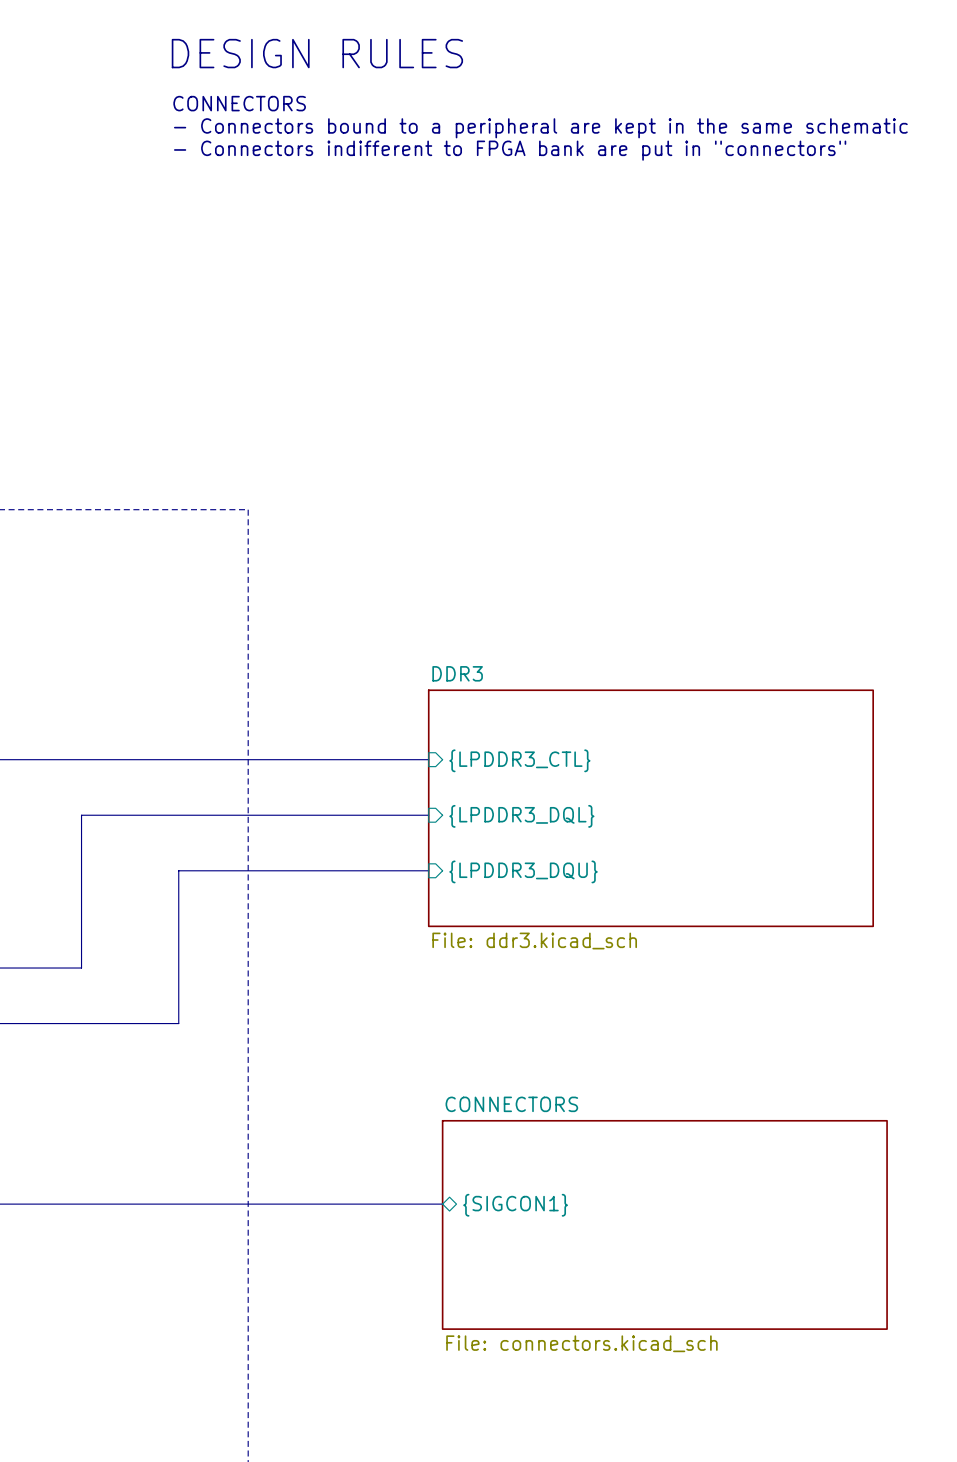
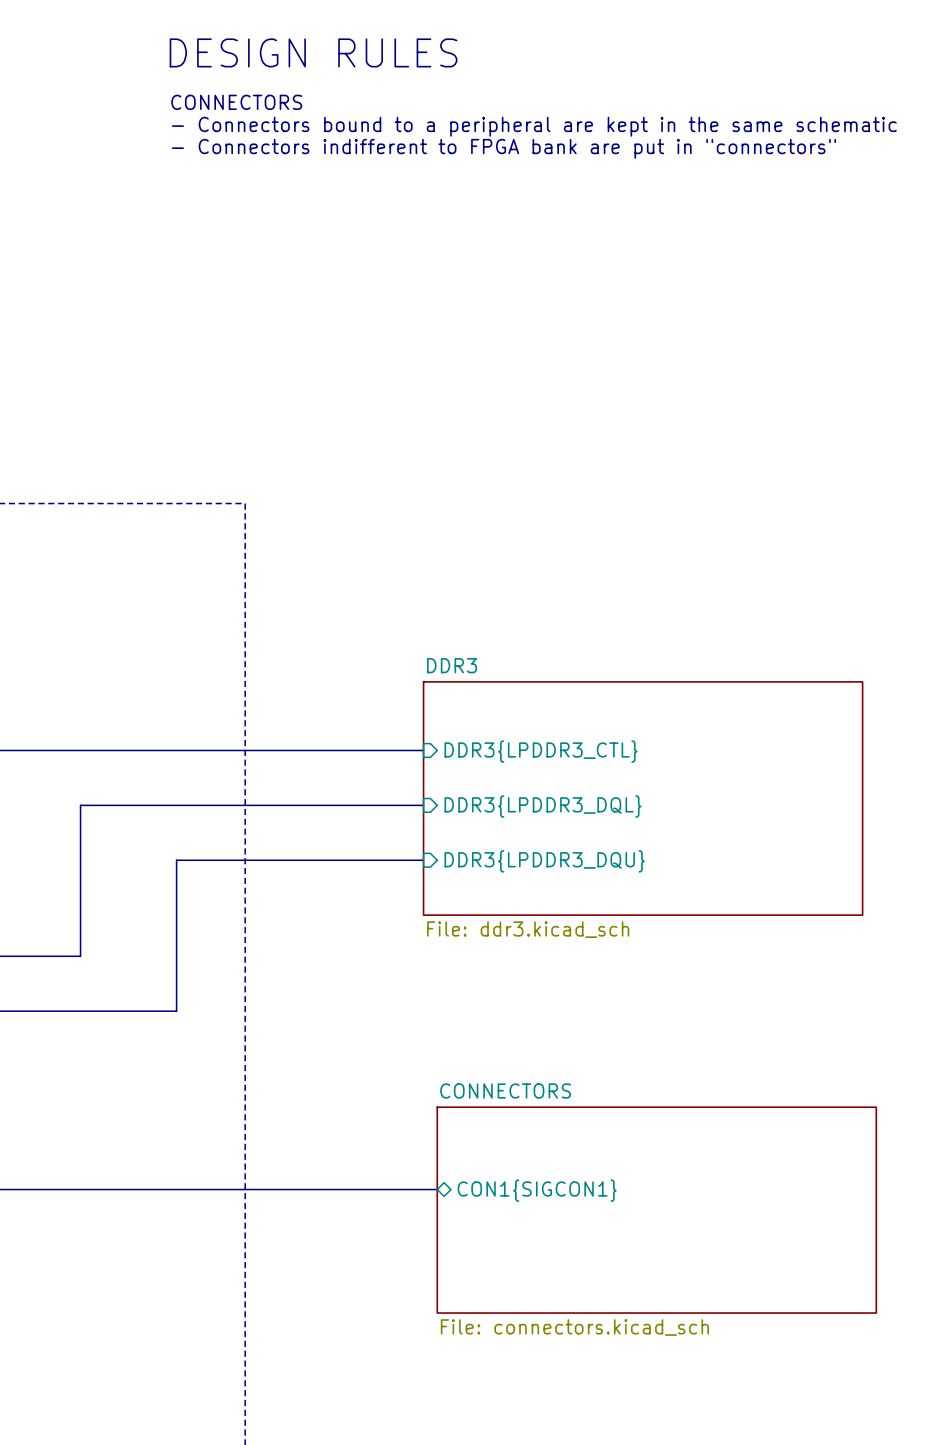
sheet pin: {LPDDR3_CTL} (519, 760) -> DDR3{LPDDR3_CTL} (541, 751)
sheet pin: {LPDDR3_DQL} (521, 816) -> DDR3{LPDDR3_DQL} (543, 806)
sheet pin: {LPDDR3_DQU} (523, 871) -> DDR3{LPDDR3_DQU} (544, 861)
sheet pin: {SIGCON1} (515, 1205) -> CON1{SIGCON1} (537, 1190)

